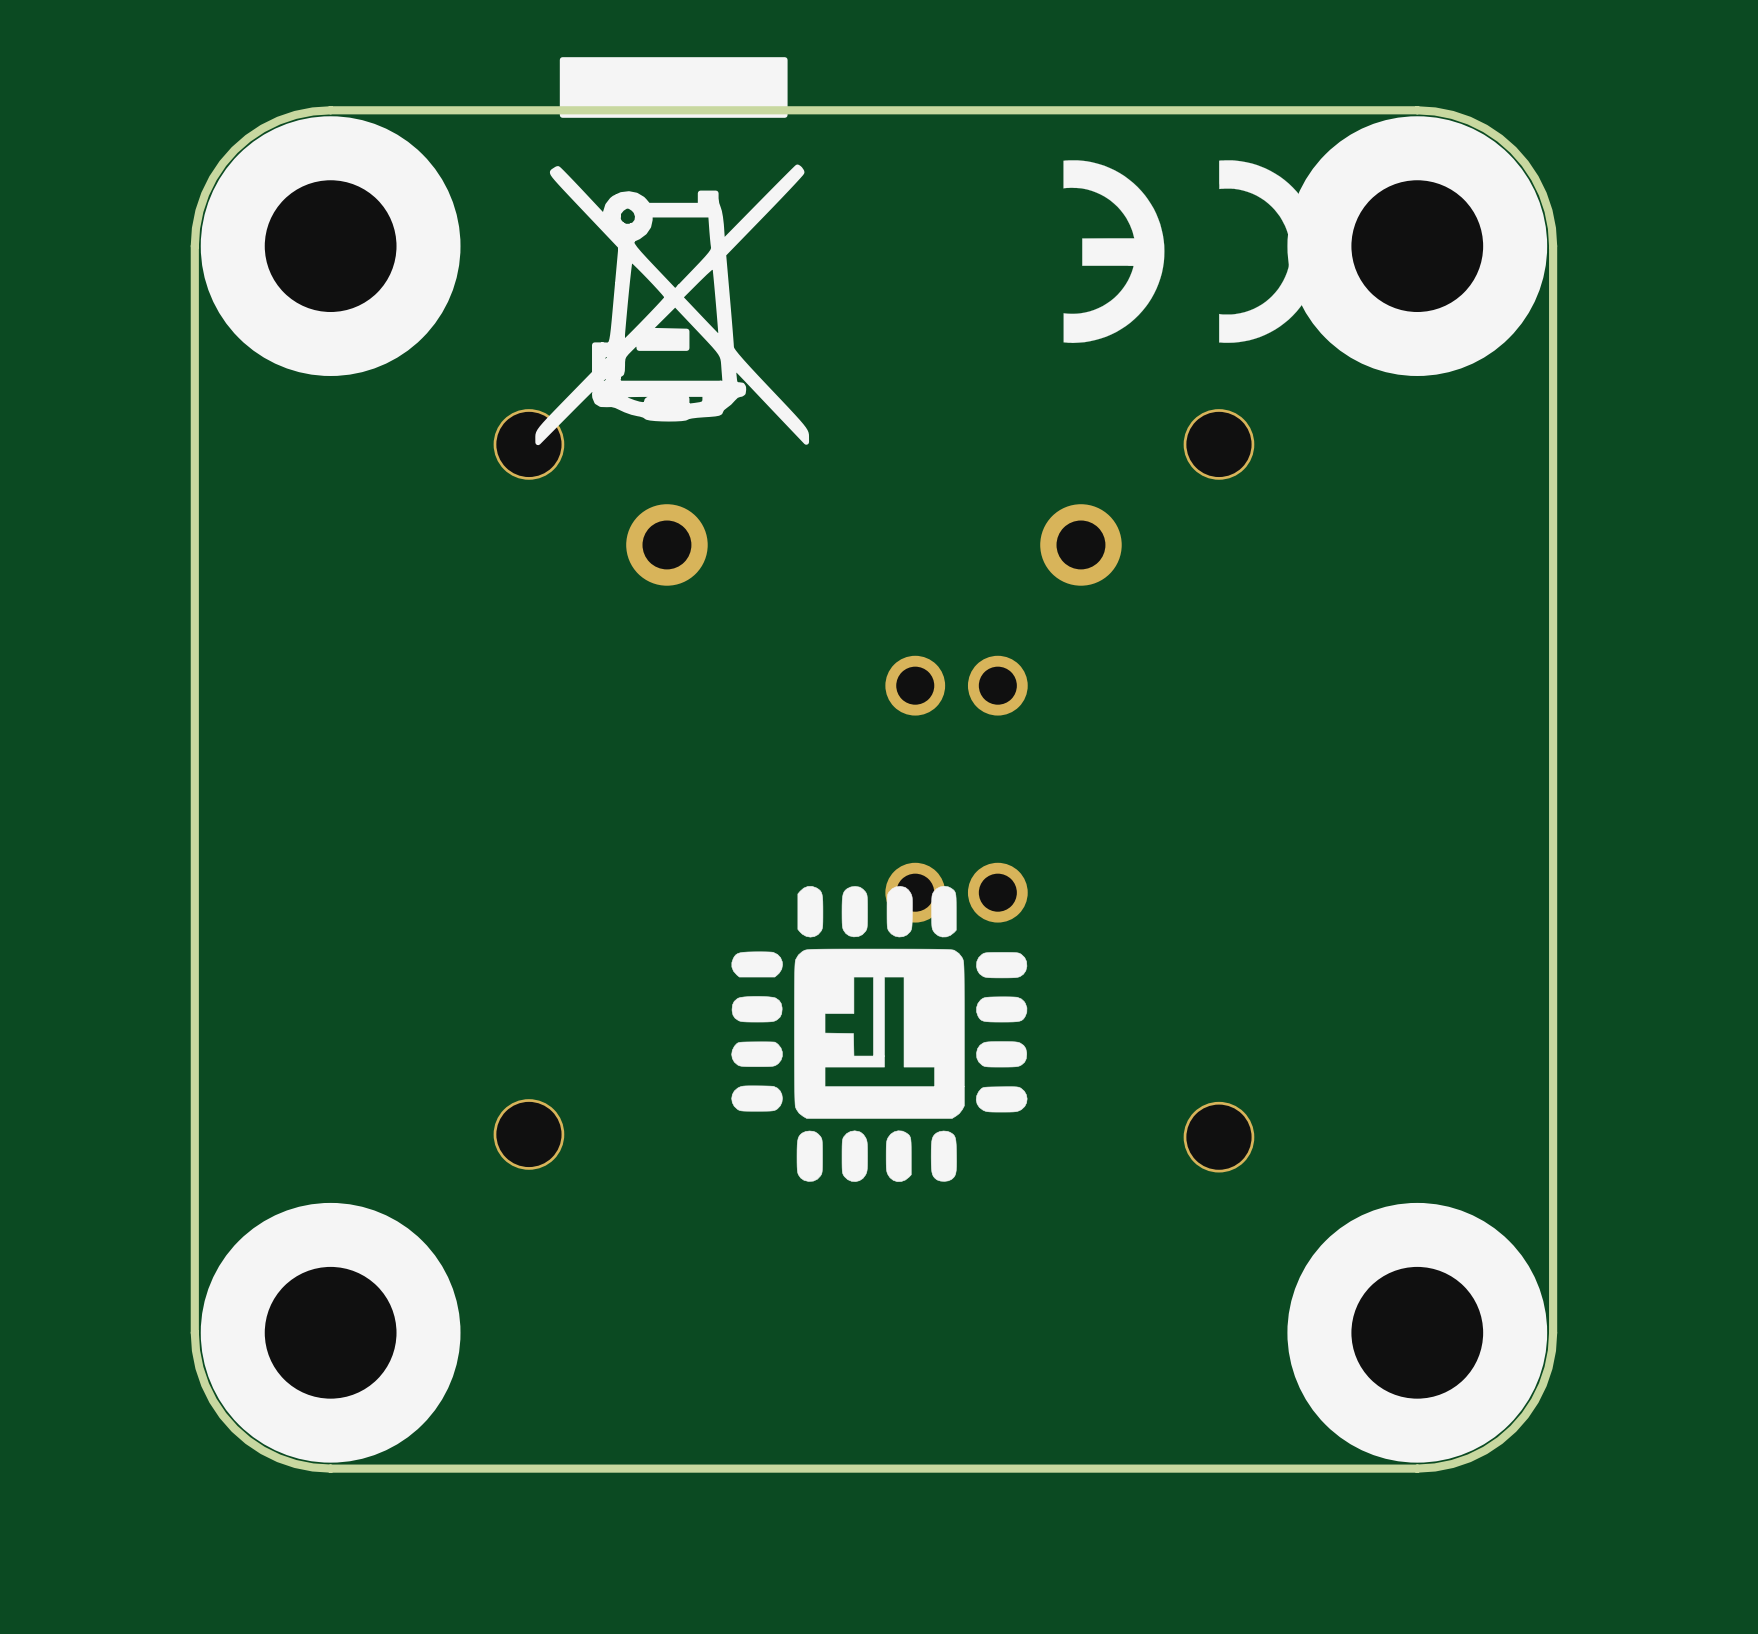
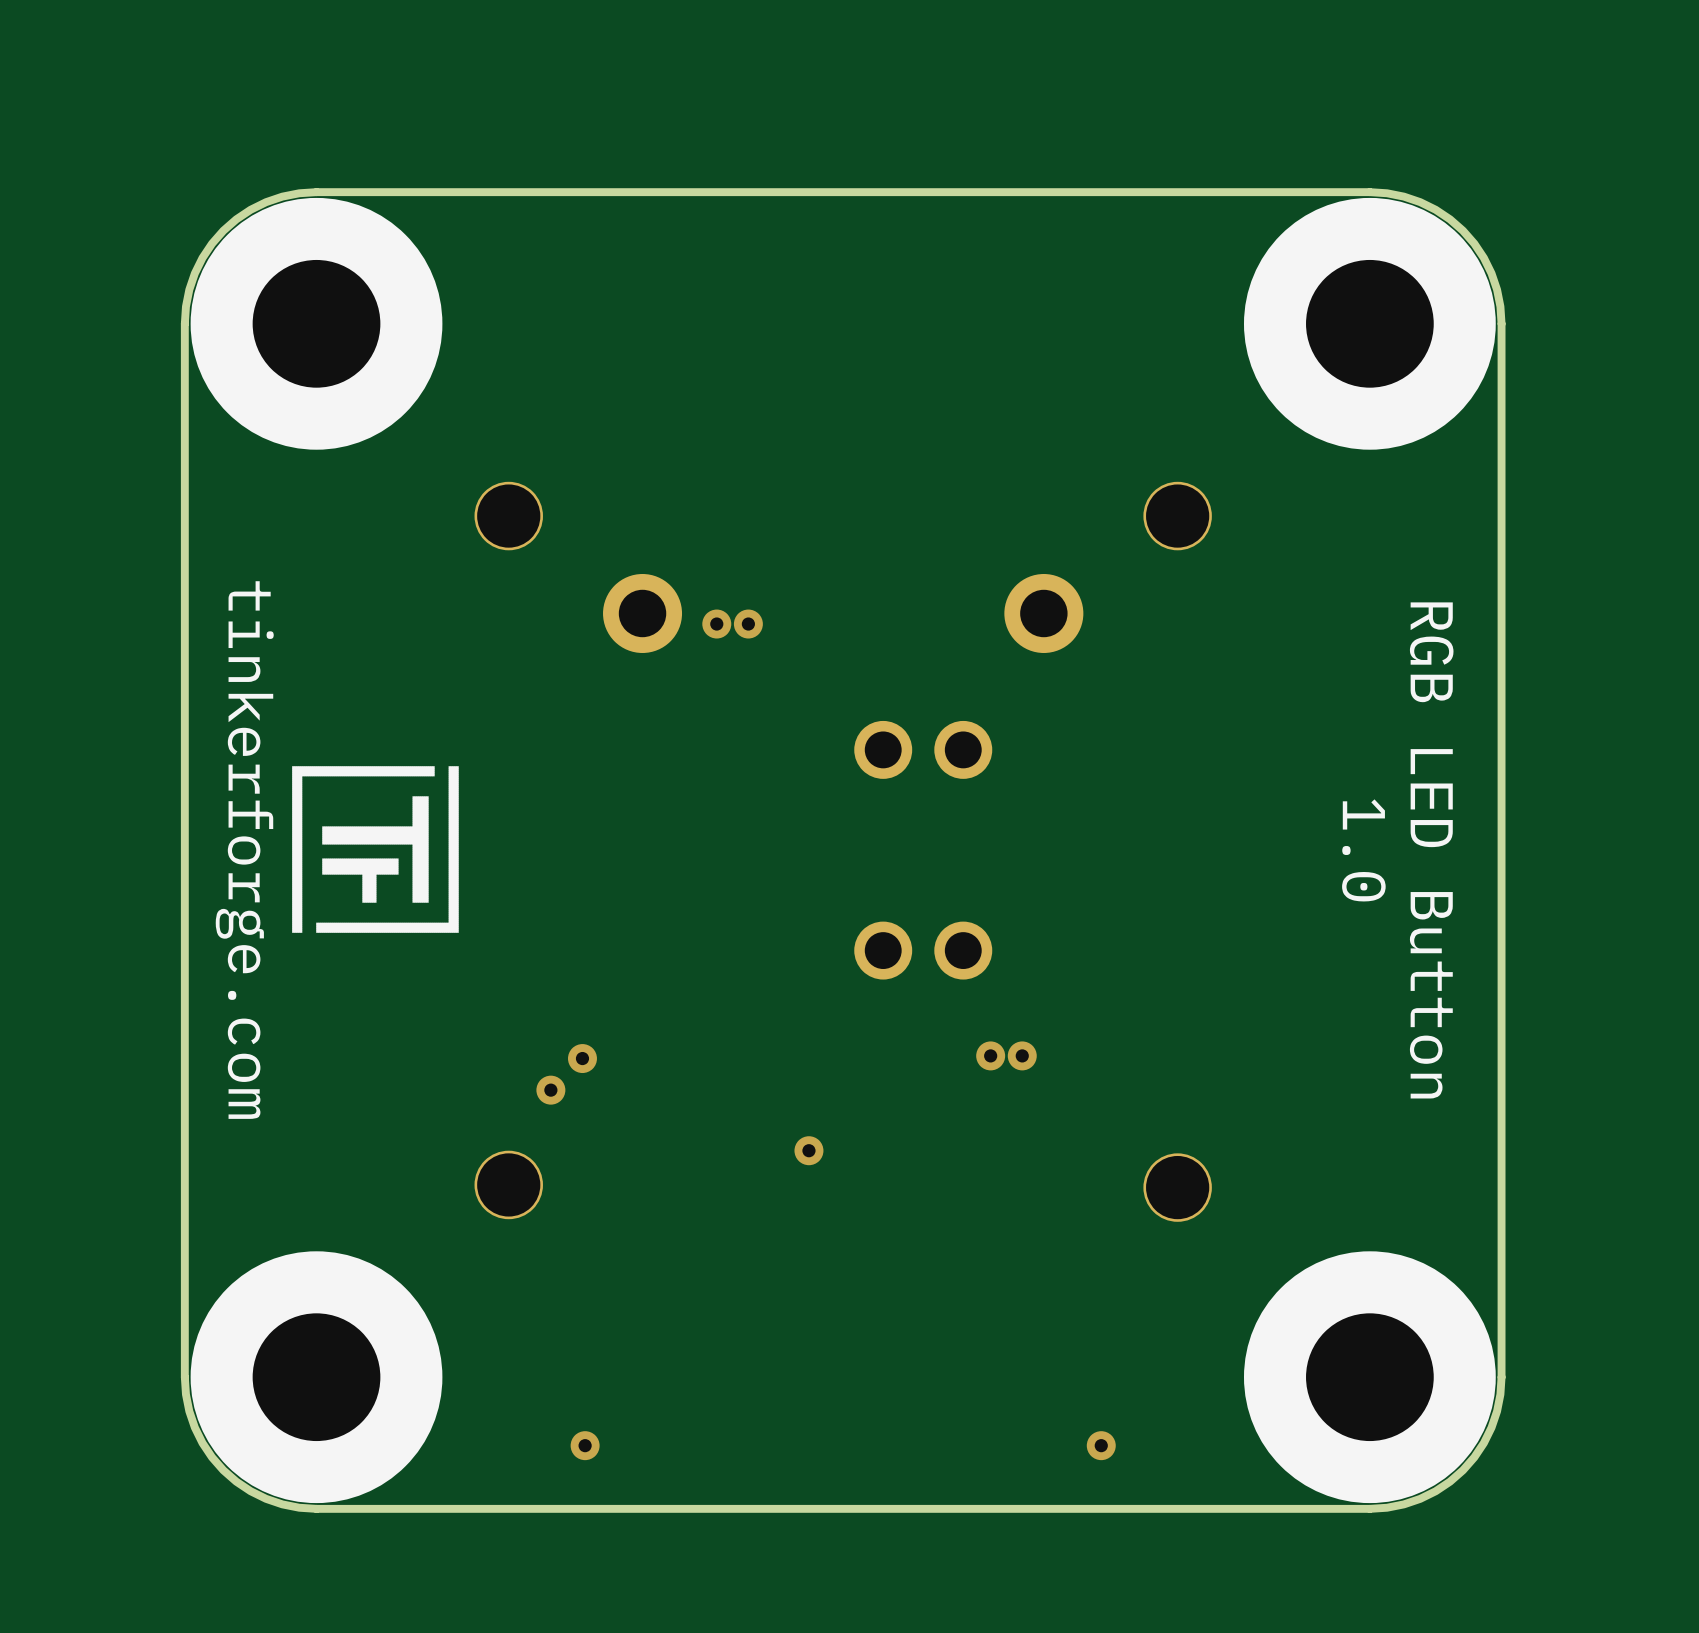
drawing: [535, 57, 810, 446] -> none
drawing: [1063, 160, 1320, 343] -> none
via: none -> (716, 624)
via: none -> (748, 624)
drawing: none -> [292, 766, 459, 933]
text: none -> tinkerforge.com (244, 850)
text: none -> 1.0 (1363, 850)
text: none -> RGB LED Button (1431, 850)
drawing: [731, 885, 1028, 1182] -> none
via: none -> (990, 1055)
via: none -> (1022, 1055)
via: none -> (582, 1058)
via: none -> (550, 1090)
via: none -> (808, 1150)
via: none -> (585, 1445)
via: none -> (1101, 1445)

